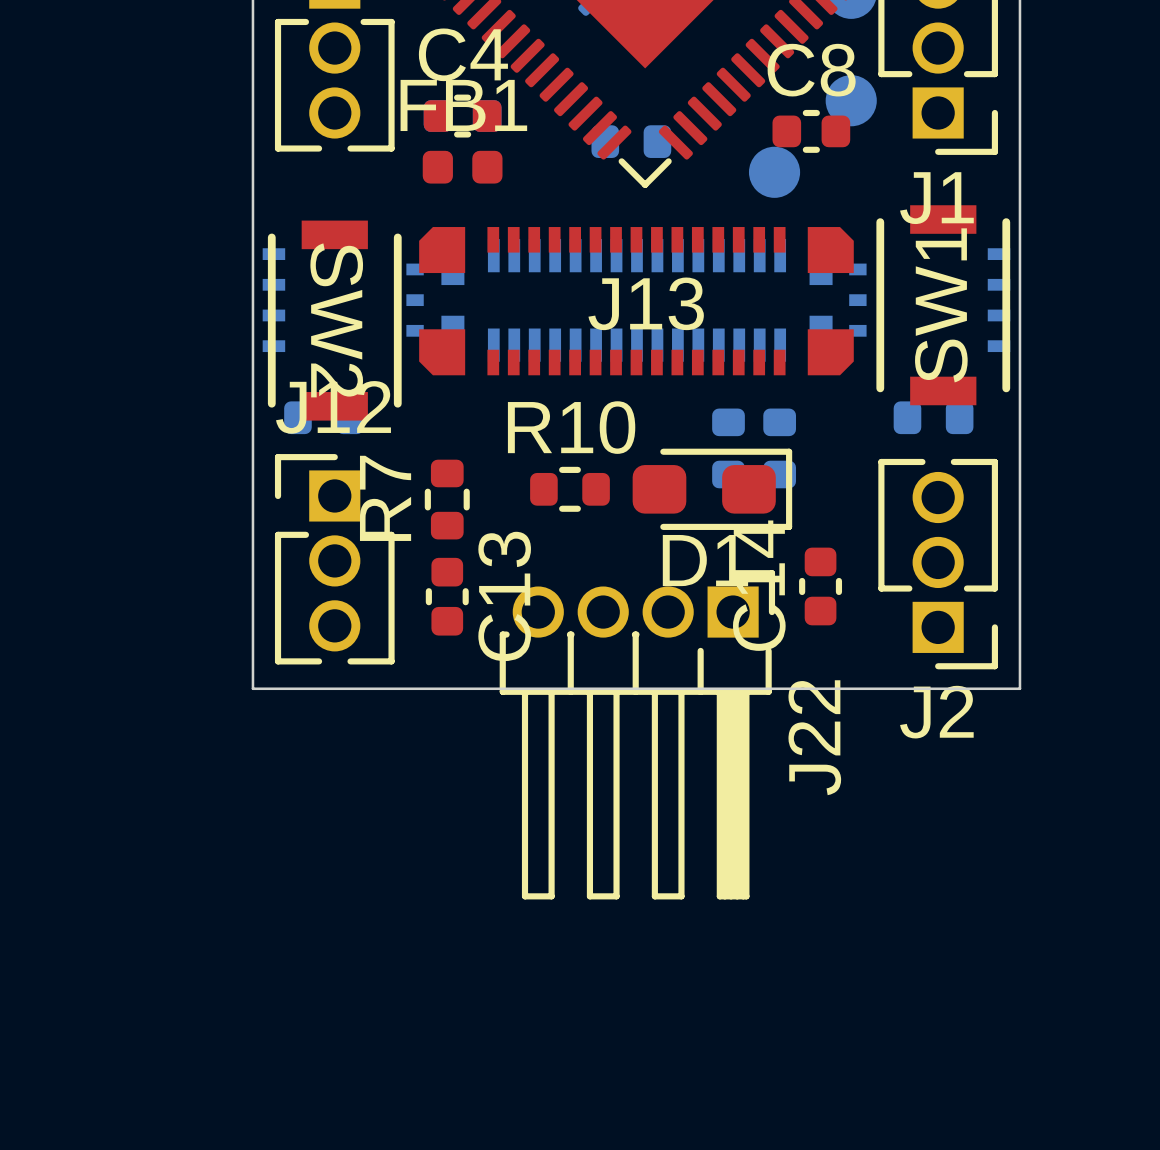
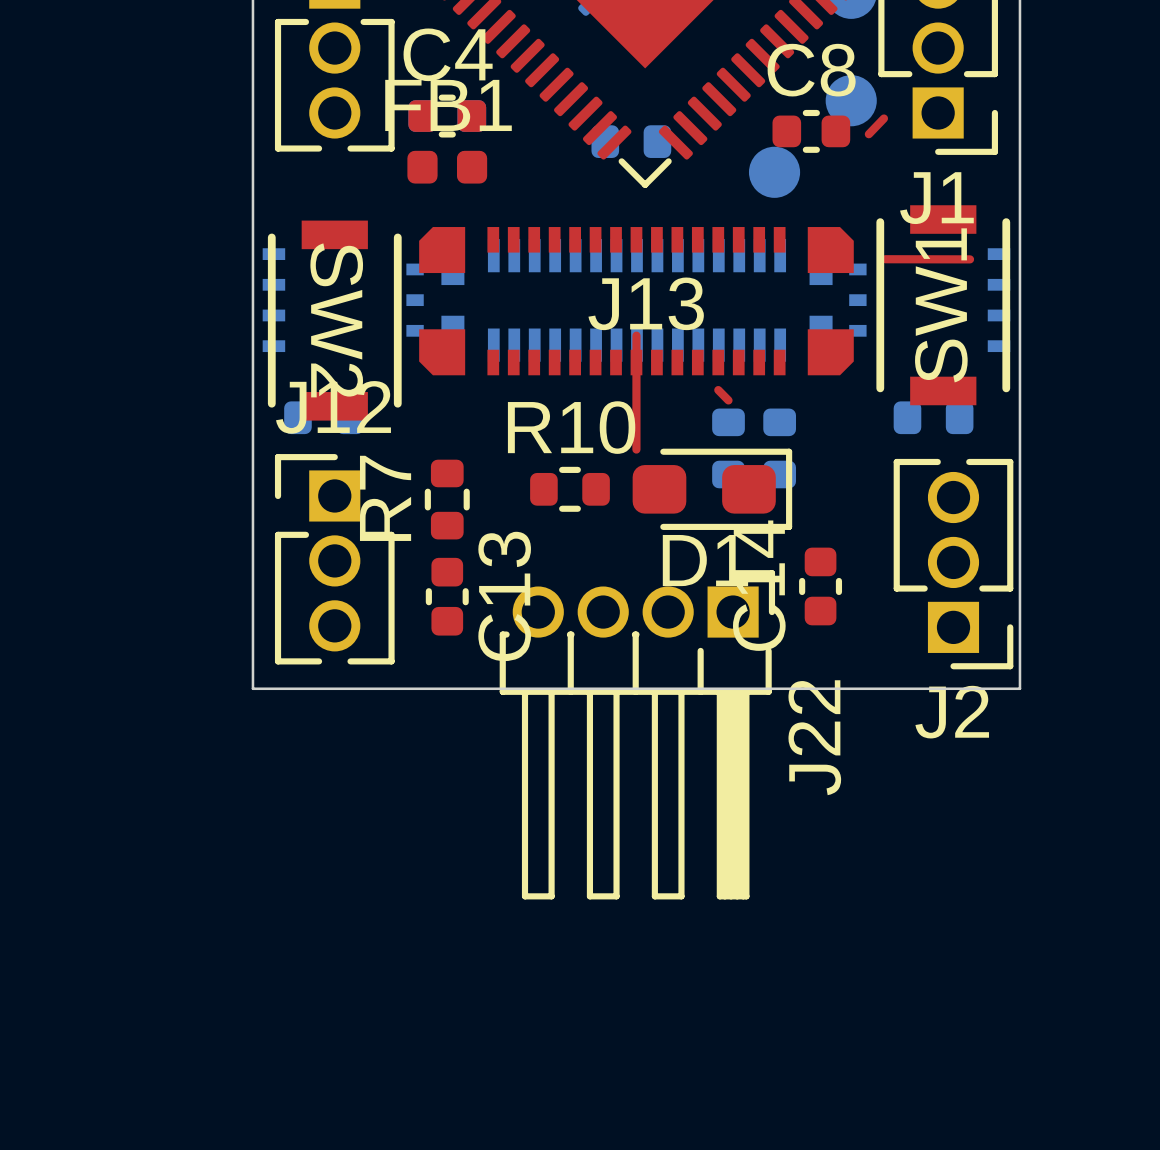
C4 position: (462, 116) -> (447, 116)
top track: none -> (883, 118) (868, 134)
FB1 position: (462, 167) -> (447, 167)
top track: none -> (885, 259) (970, 259)
top track: none -> (636, 335) (636, 449)
top track: none -> (718, 390) (728, 400)
J2 position: (938, 564) -> (953, 564)

